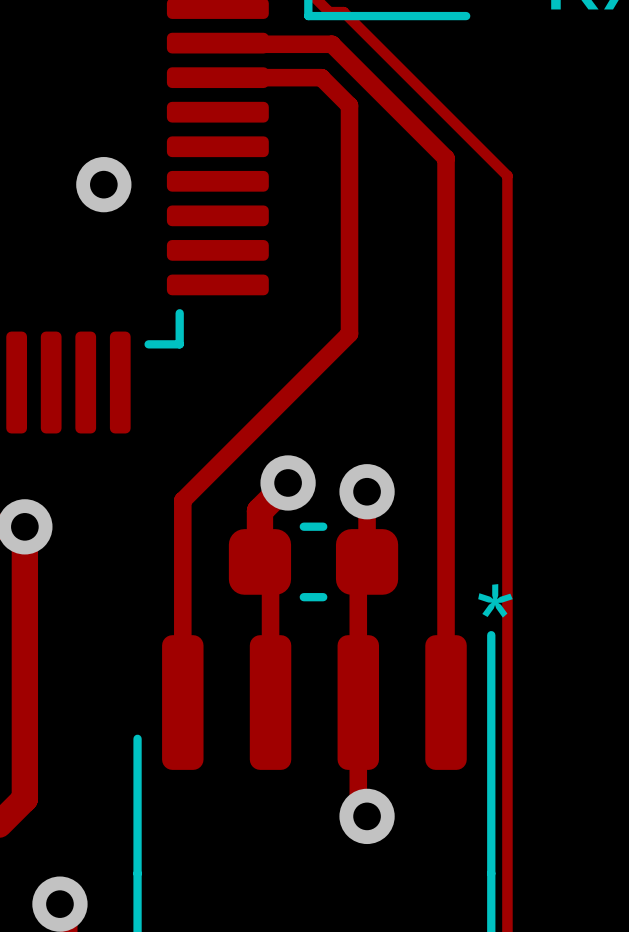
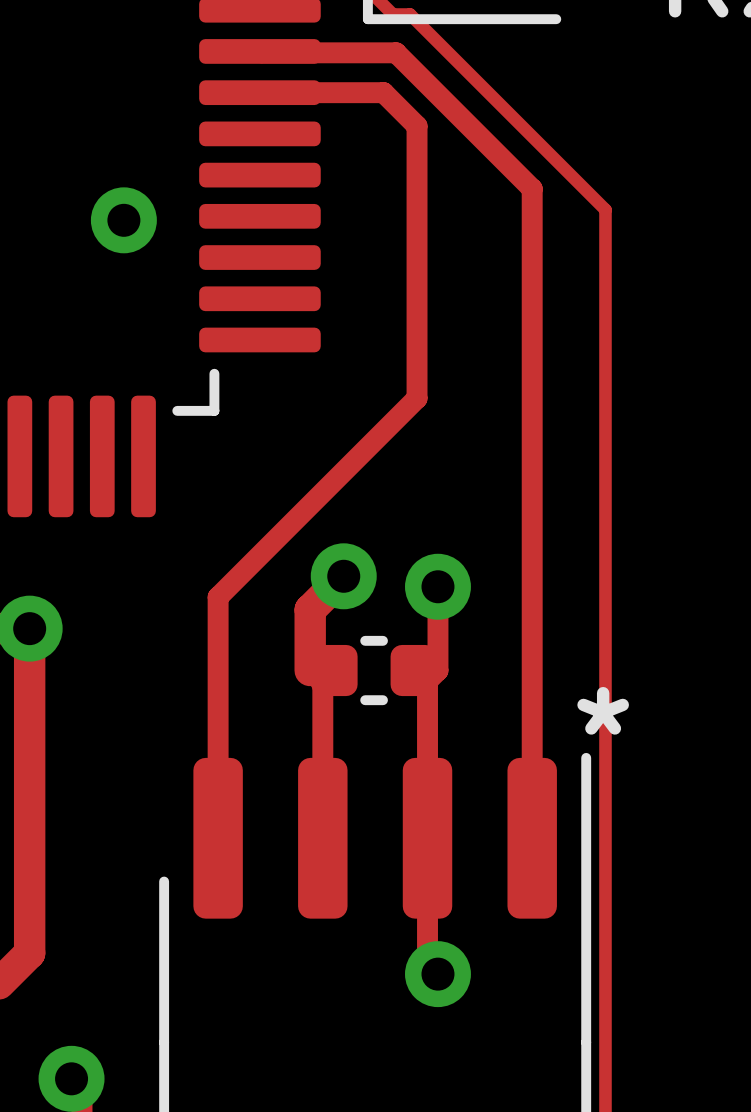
part footprint: [228, 522, 399, 602] -> [311, 635, 437, 706]

